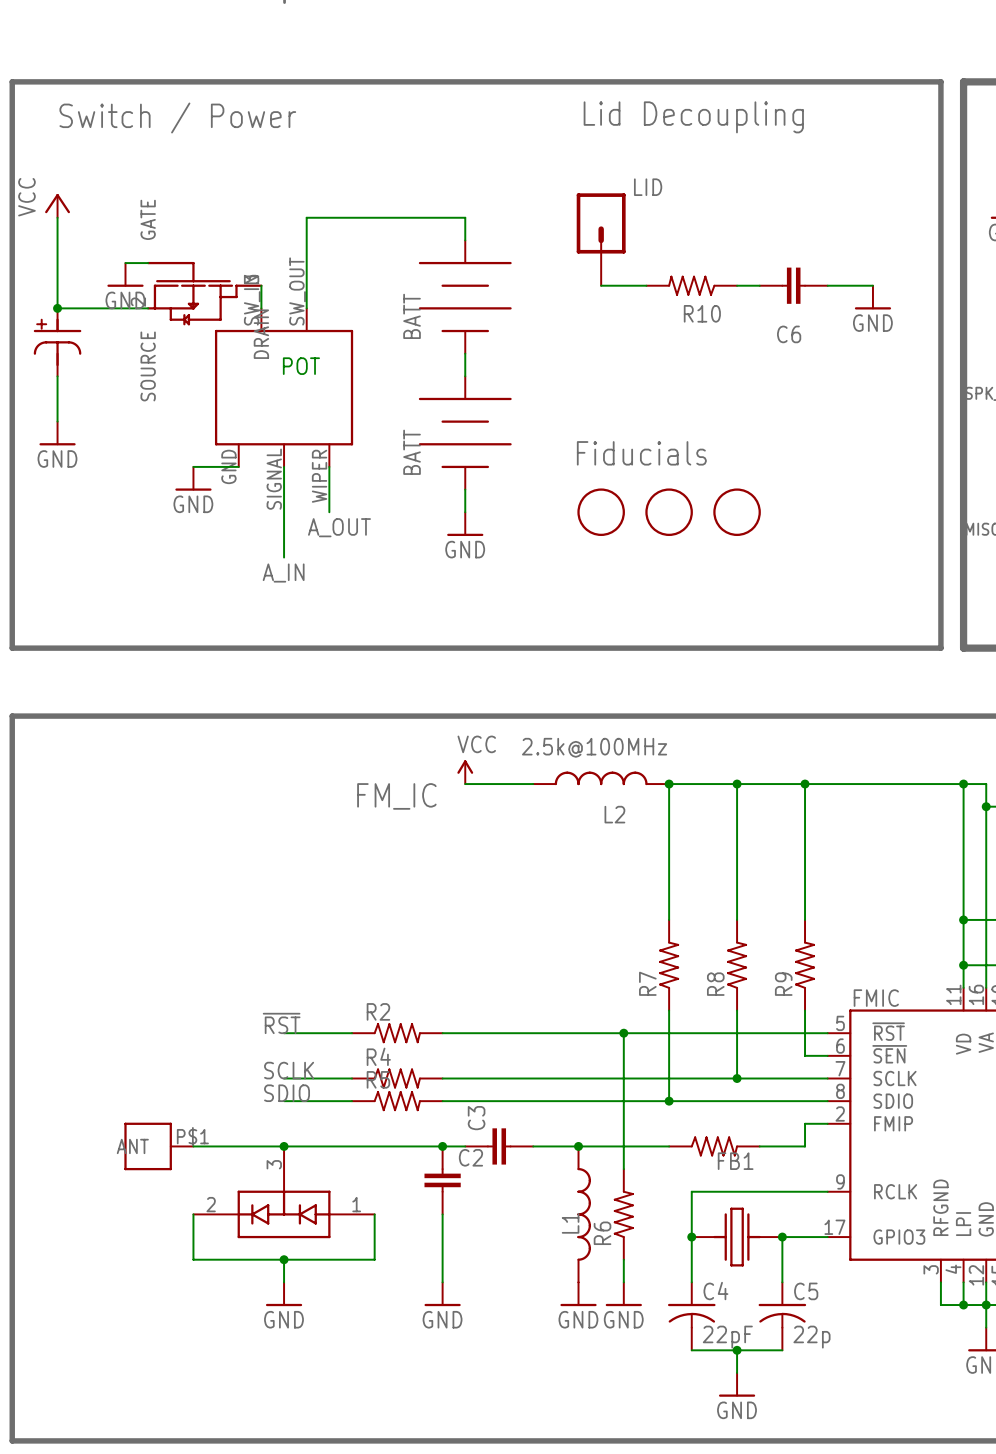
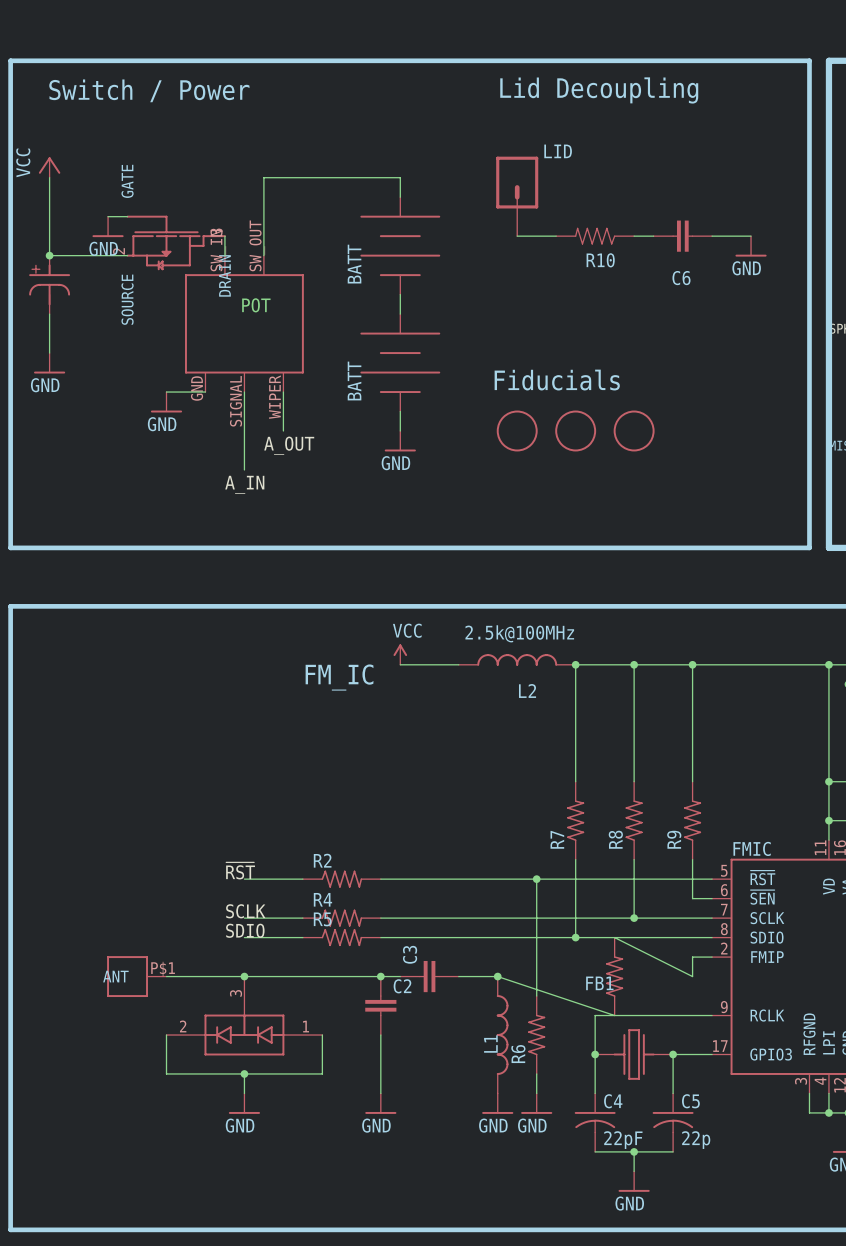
wire: (578, 1146) (669, 1146) -> (497, 976) (614, 1015)
FB1 rotation: 0° (714, 1146) -> 90° counterclockwise (614, 976)
wire: (759, 1146) (805, 1146) -> (614, 937) (692, 976)
FB1 name position: FB1 (735, 1161) -> FB1 (599, 983)

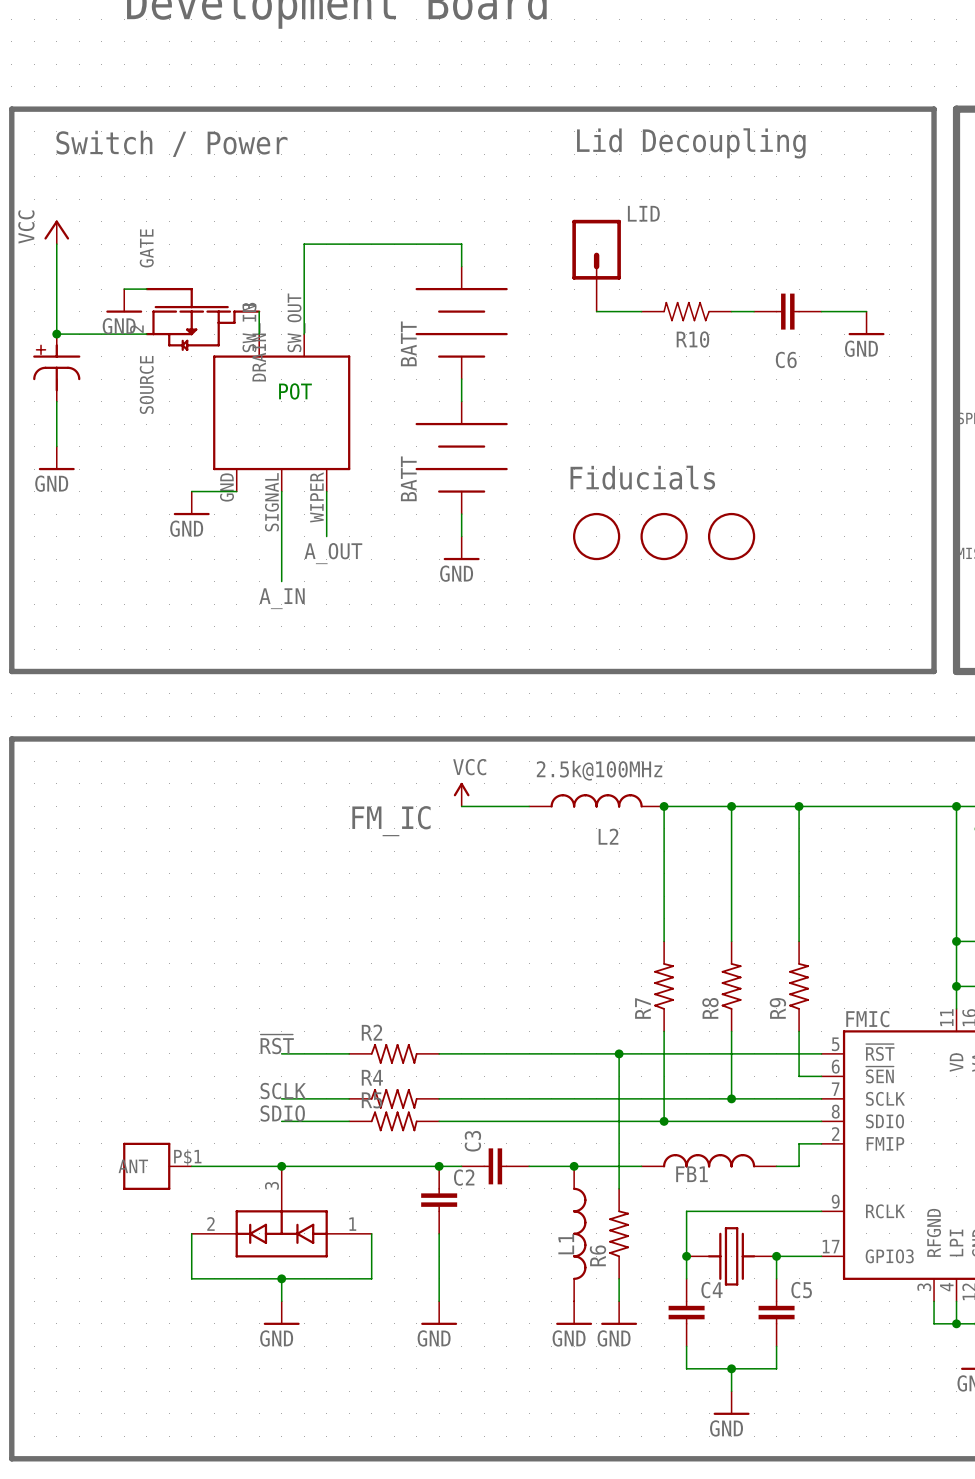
FB1 symbol: [606, 937, 624, 1016] -> [641, 1153, 777, 1168]
wire: (614, 937) (692, 976) -> (776, 1166) (799, 1166)
wire: (497, 976) (614, 1015) -> (574, 1166) (641, 1166)
C4 symbol: [574, 1093, 616, 1152] -> [668, 1278, 705, 1347]
C5 symbol: [652, 1093, 694, 1152] -> [758, 1278, 795, 1347]
C4 value: 22pF (623, 1140) -> none
C5 value: 22p (696, 1140) -> none

